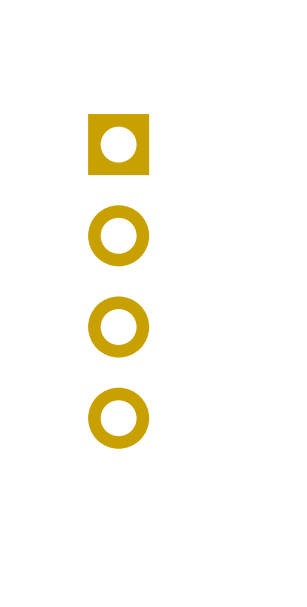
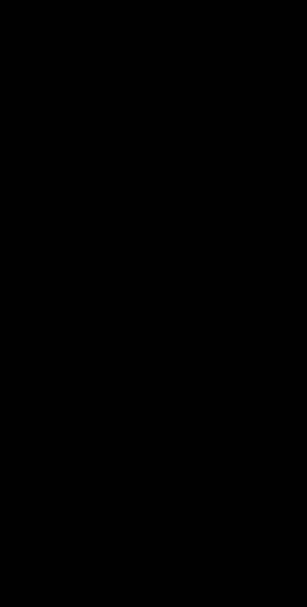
part: (118, 281) -> none

